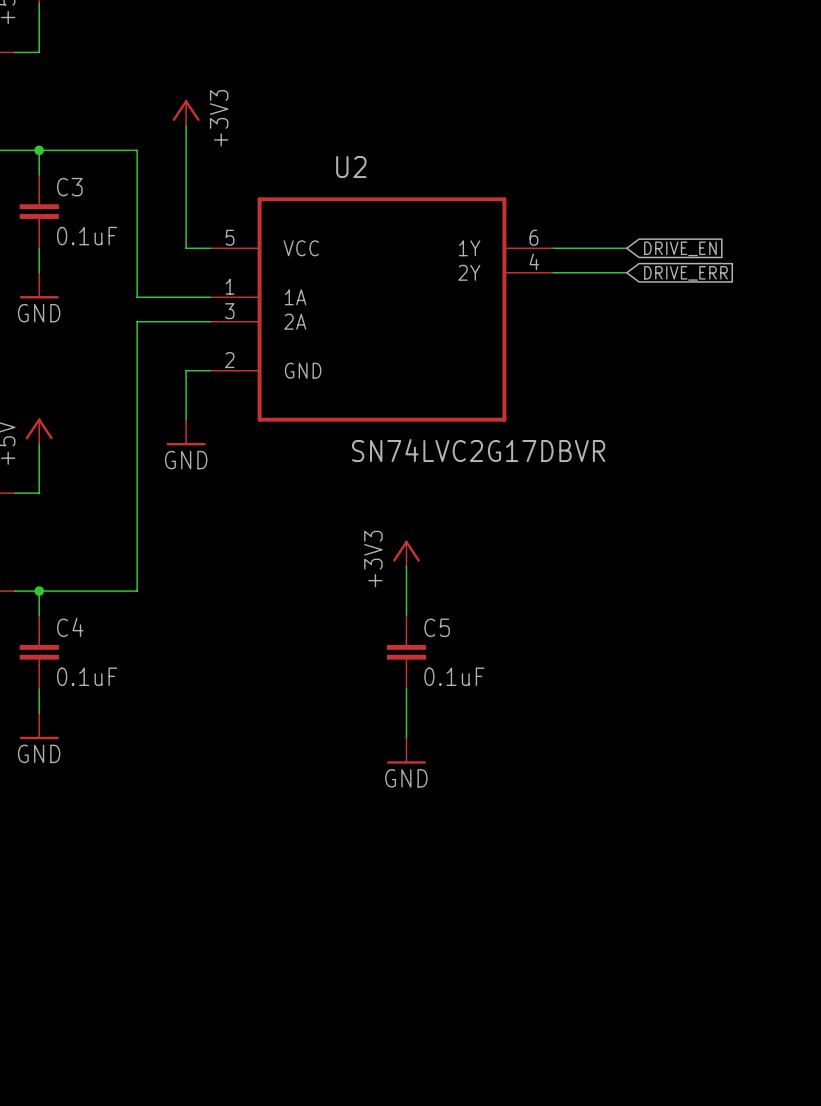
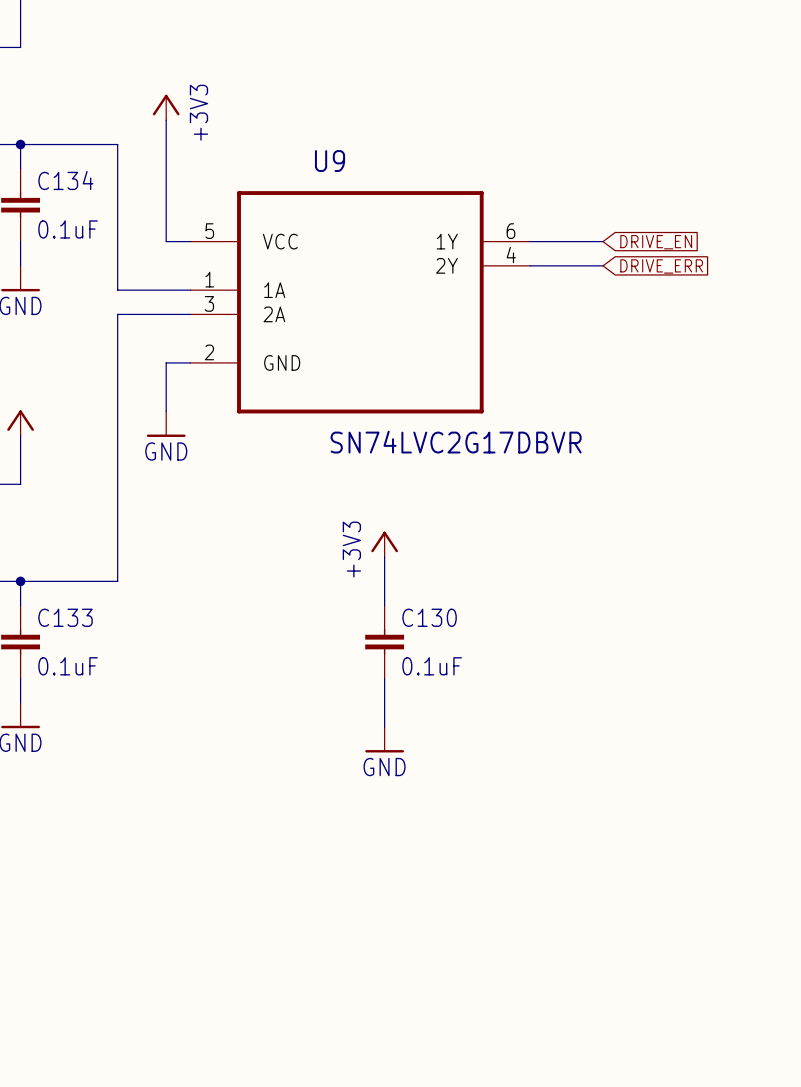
U2 name: U2 (351, 167) -> U9 (330, 161)
C3 name: C3 (69, 187) -> C134 (65, 180)
C4 name: C4 (70, 627) -> C133 (65, 617)
C5 name: C5 (437, 627) -> C130 (429, 617)

